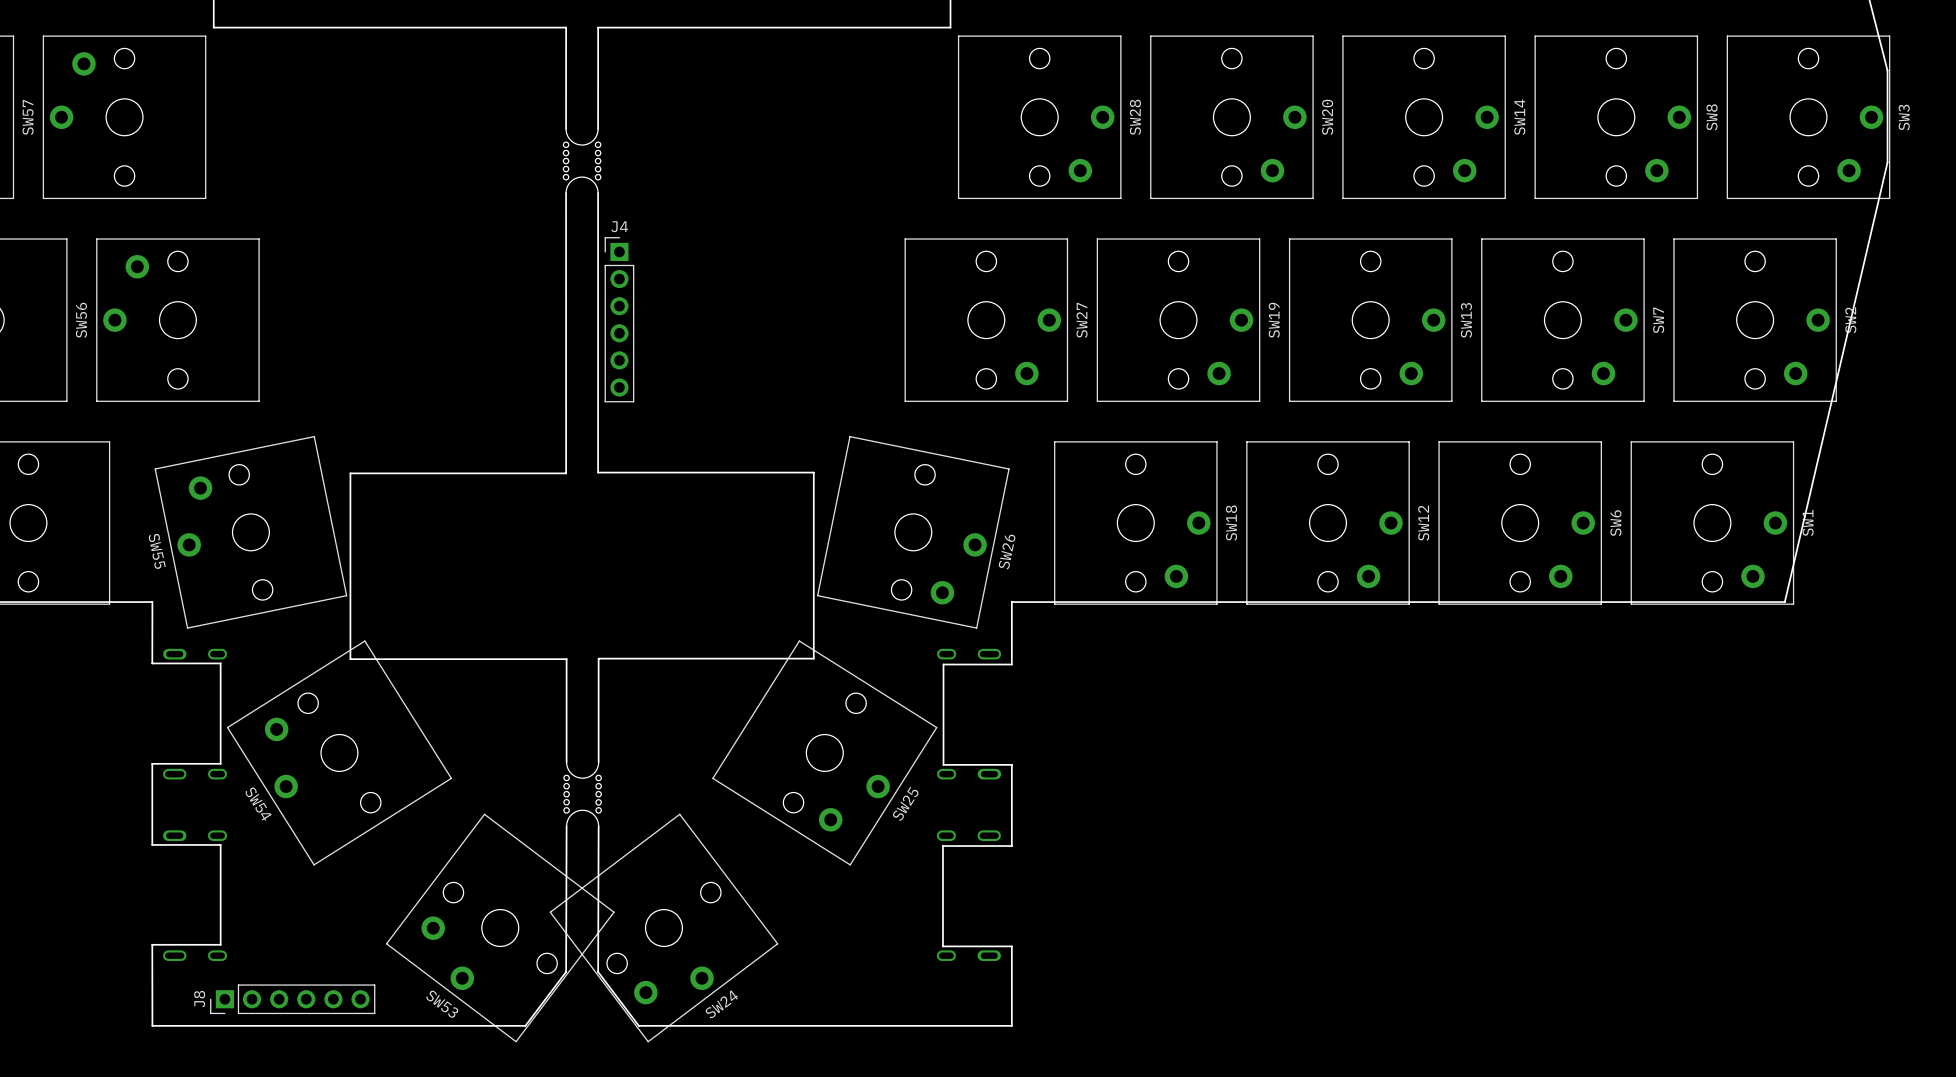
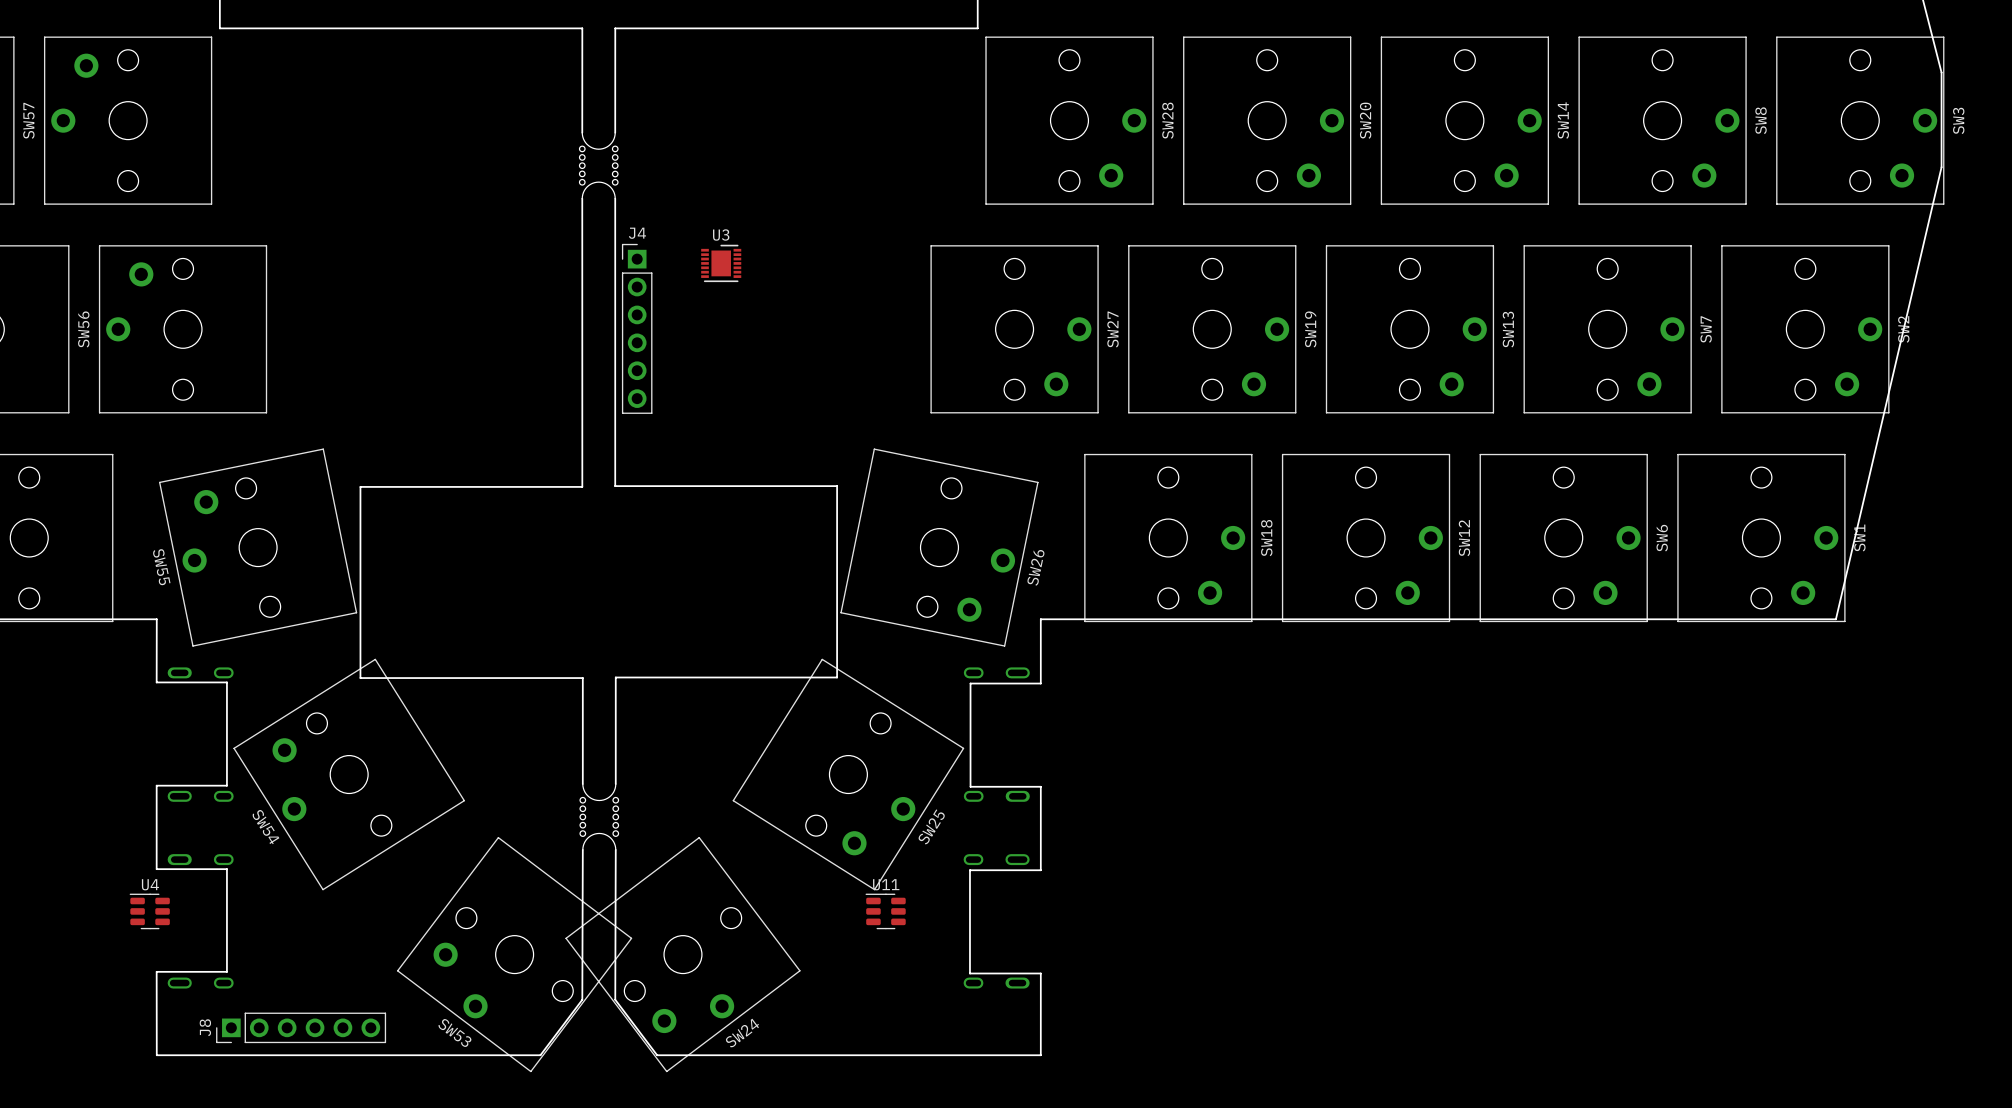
U3: none -> (721, 263)
U4: none -> (149, 911)
U11: none -> (885, 911)

